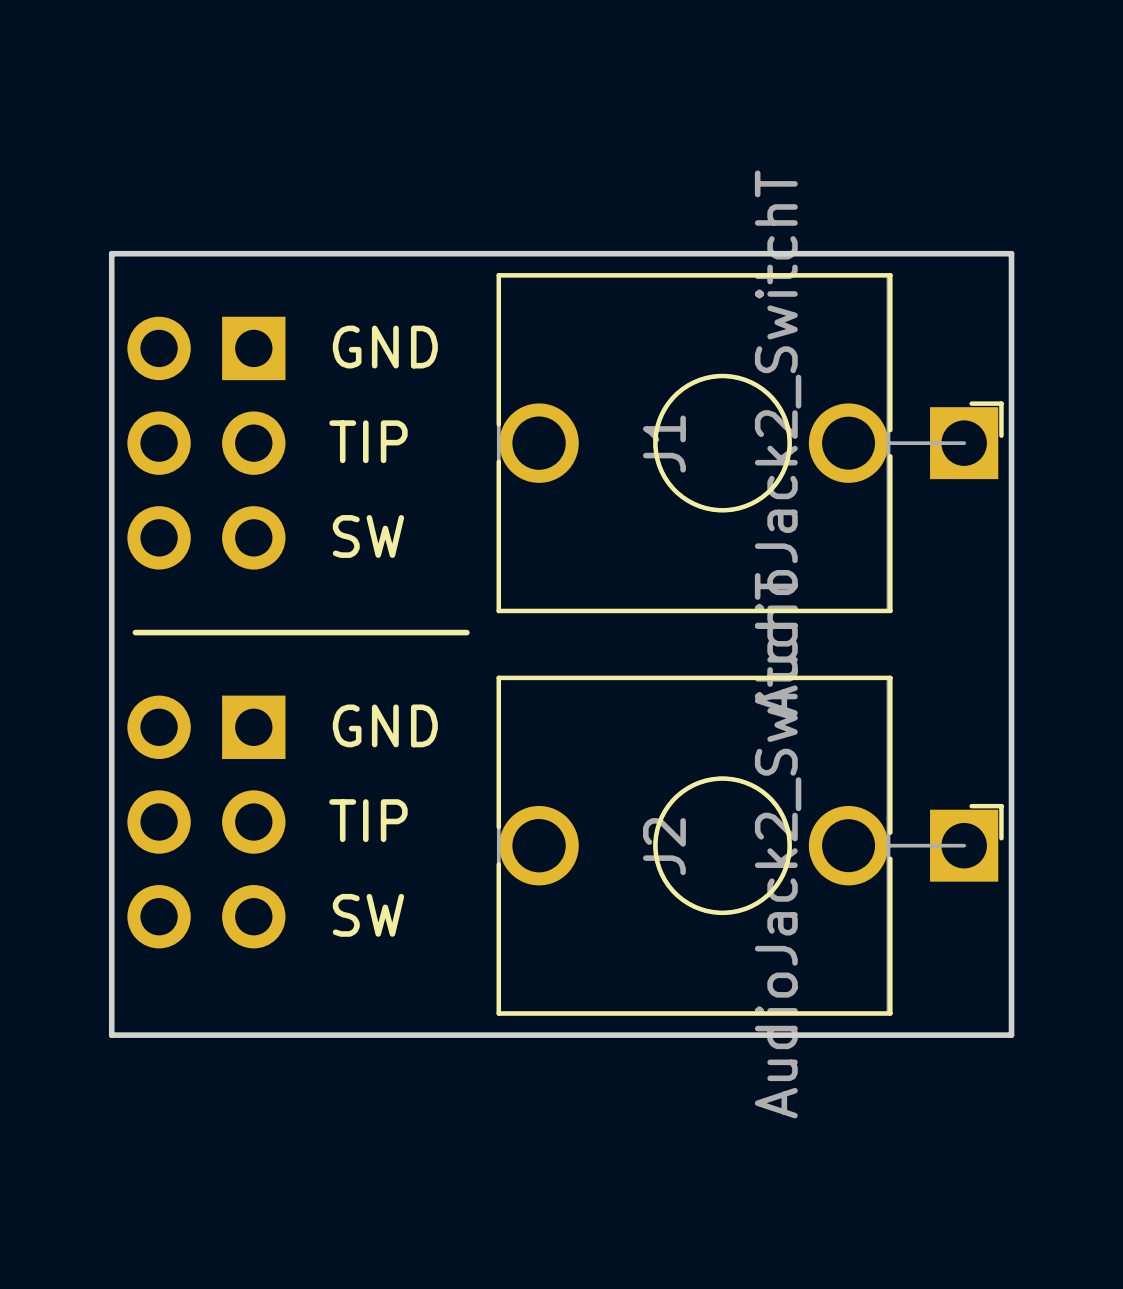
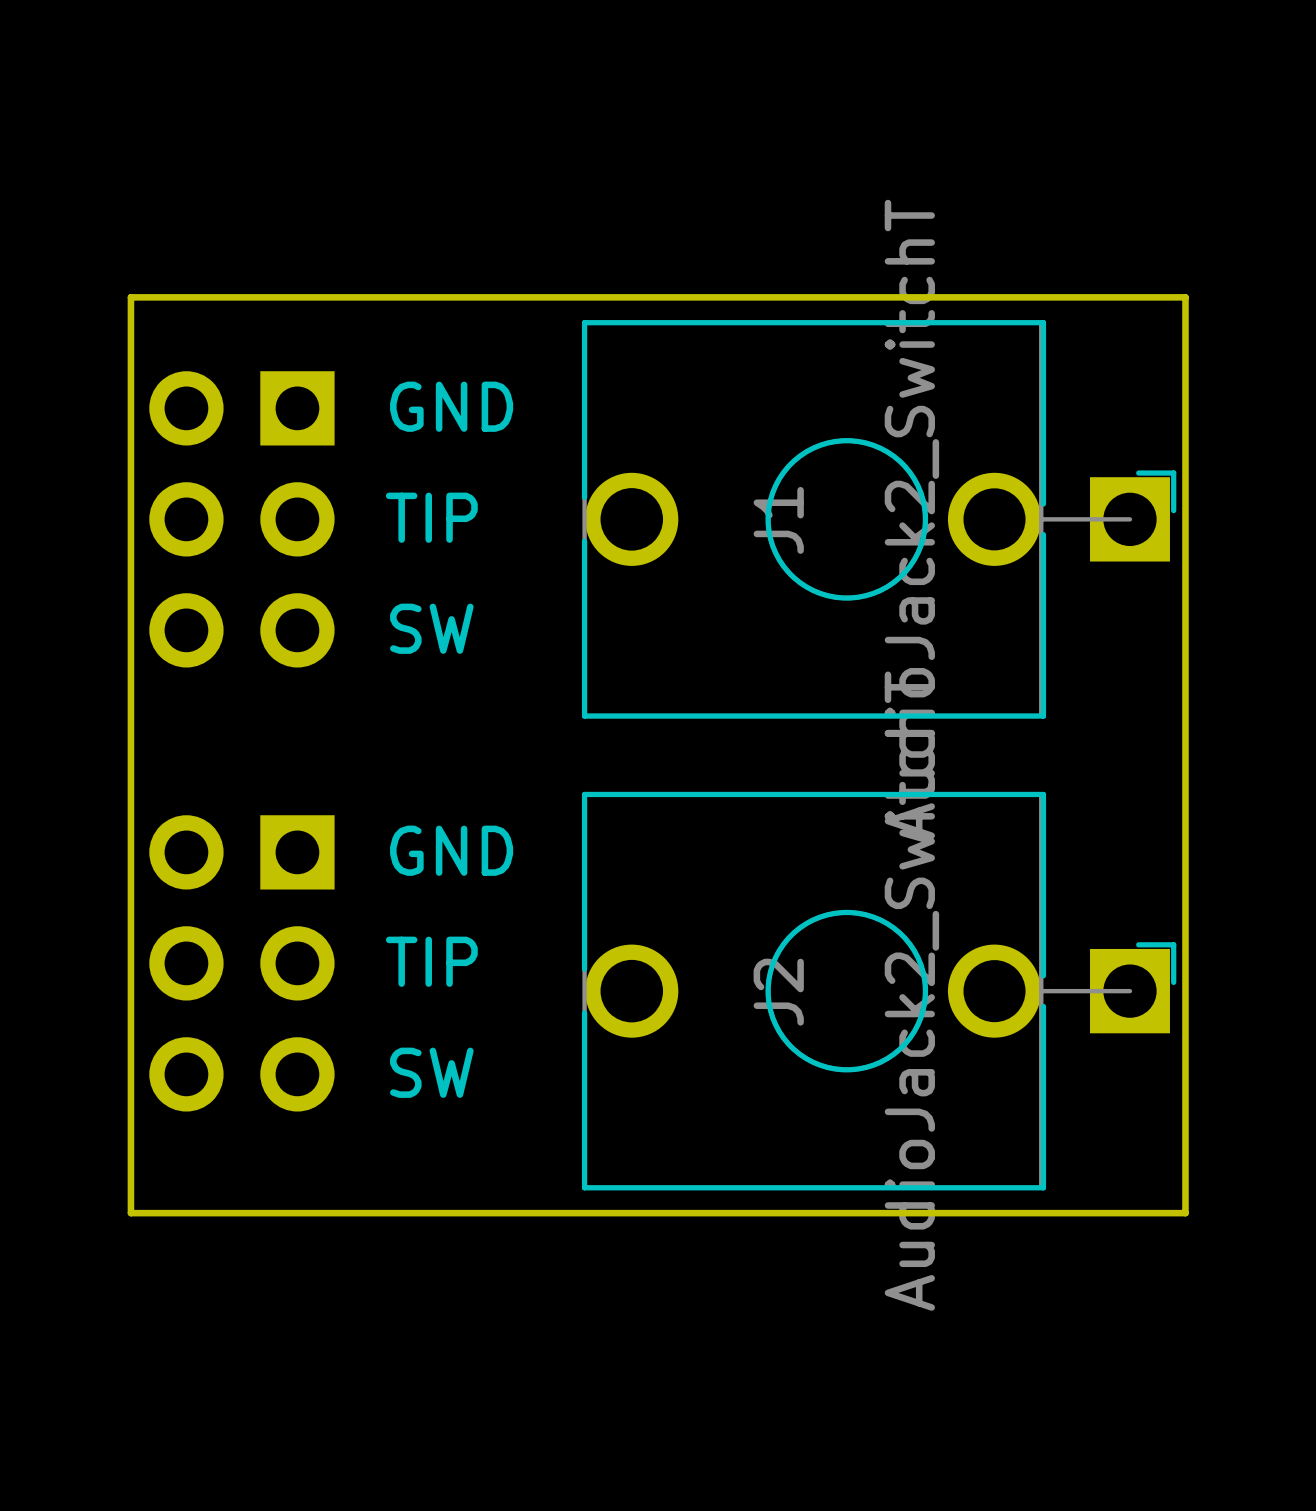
line: (135, 632) (466, 632) -> none

